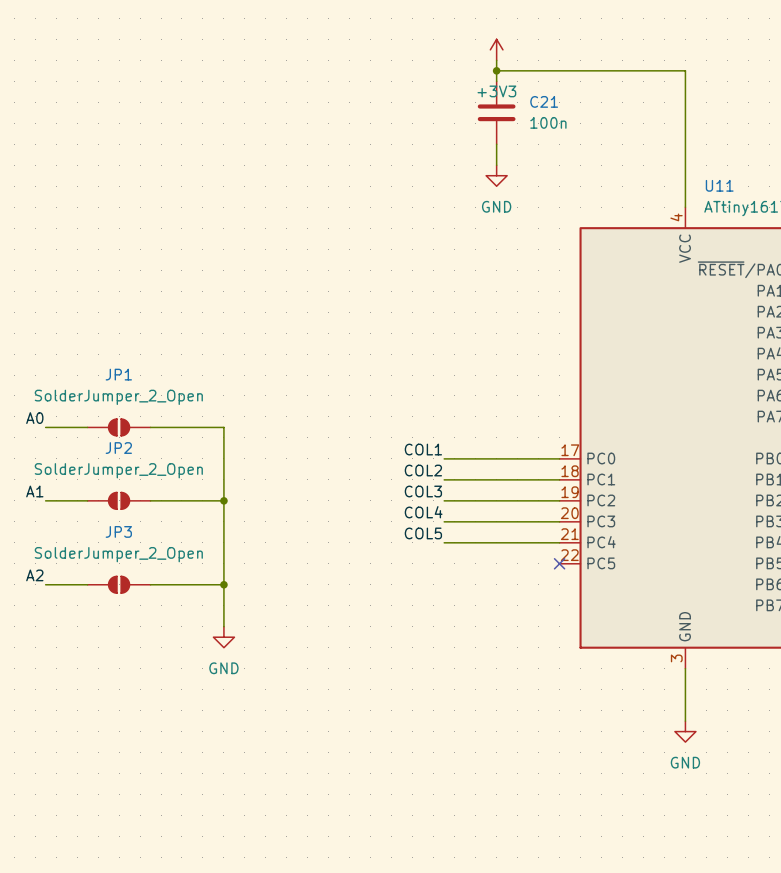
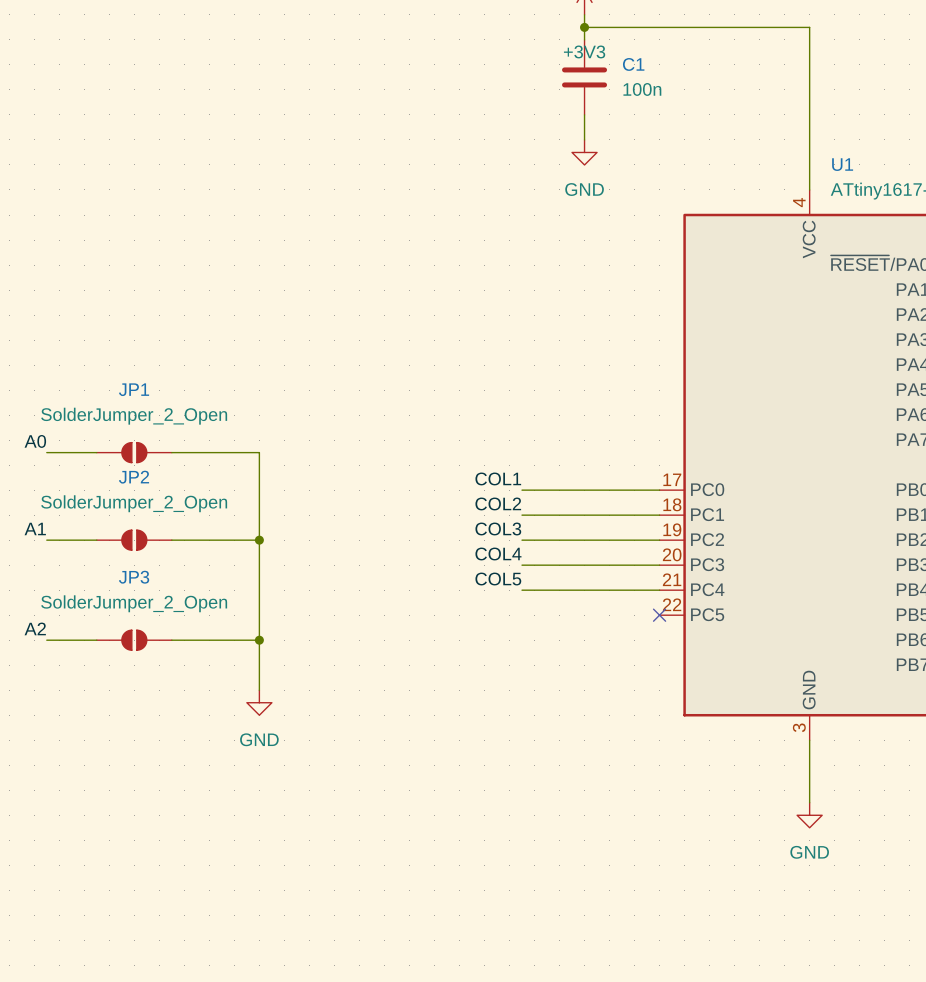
C21 name: C21 (544, 101) -> C1 (633, 64)
U11 name: U11 (719, 185) -> U1 (842, 164)

